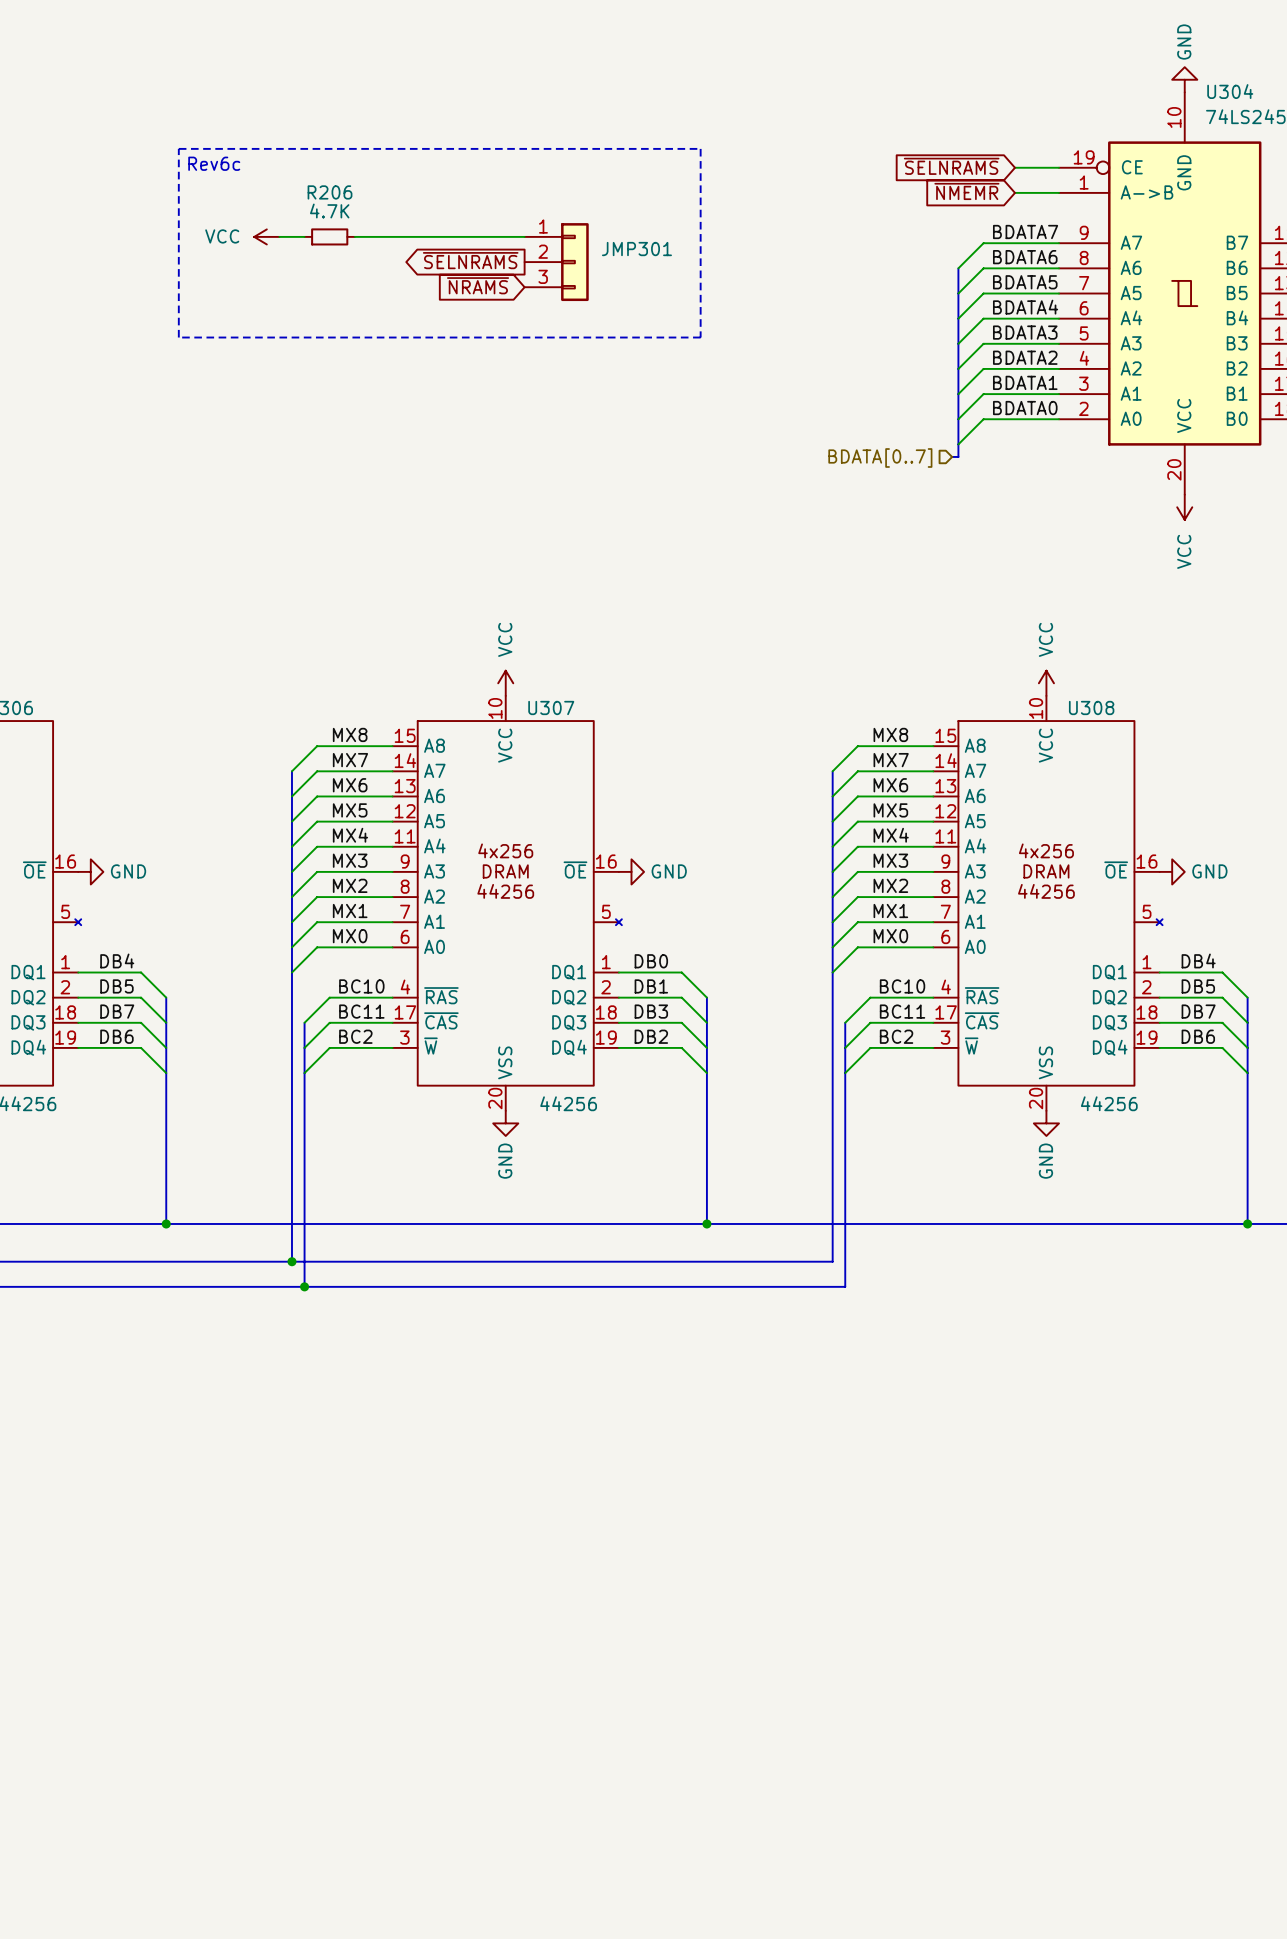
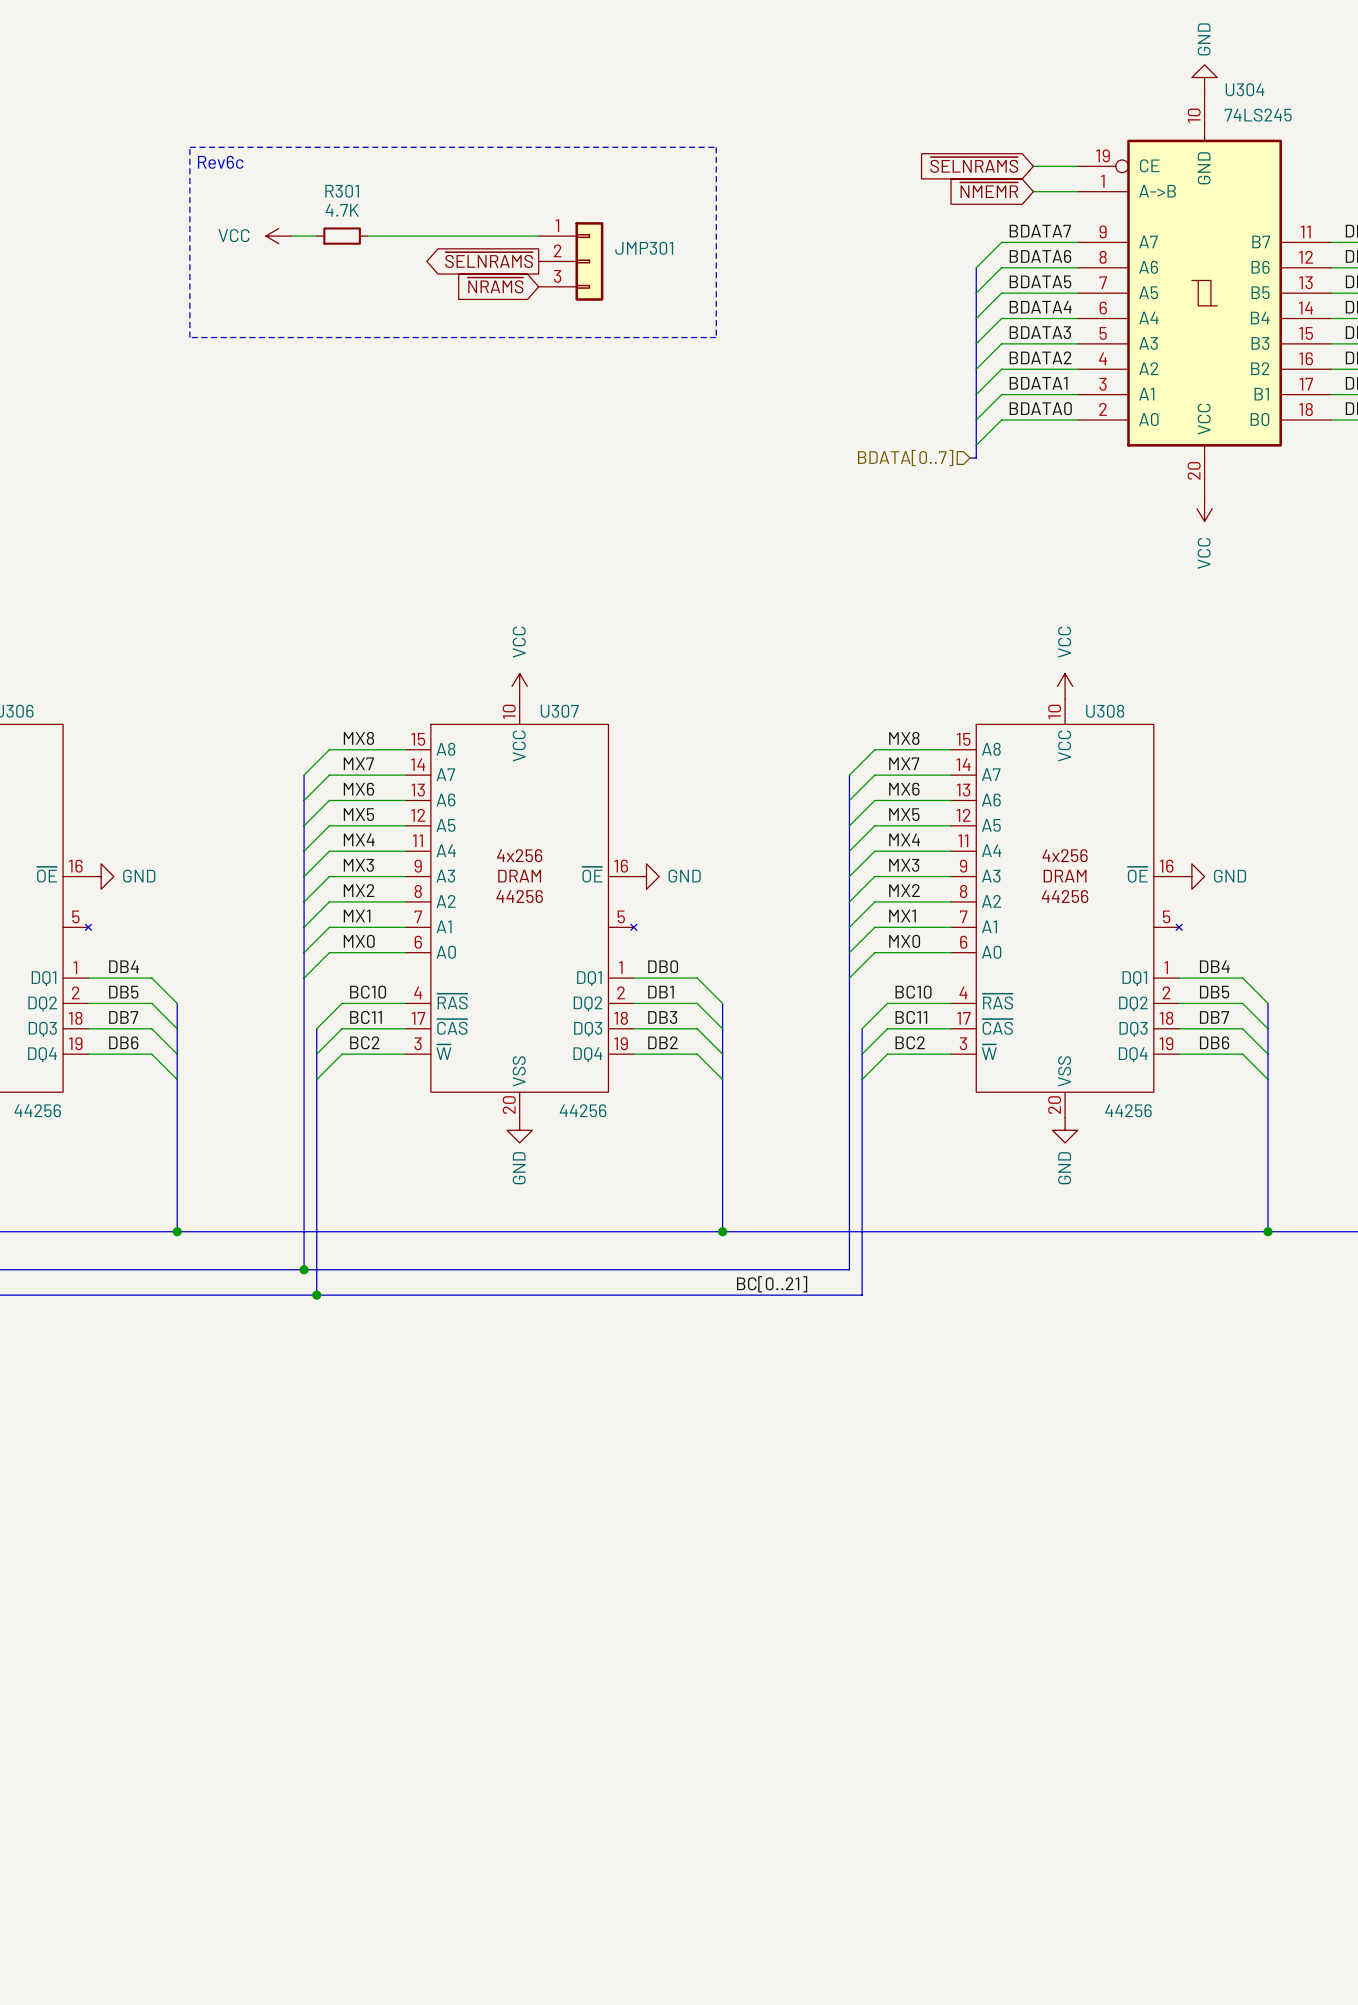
R206 name: R206 (330, 192) -> R301 (342, 191)
label: none -> BC[0..21] (772, 1284)

